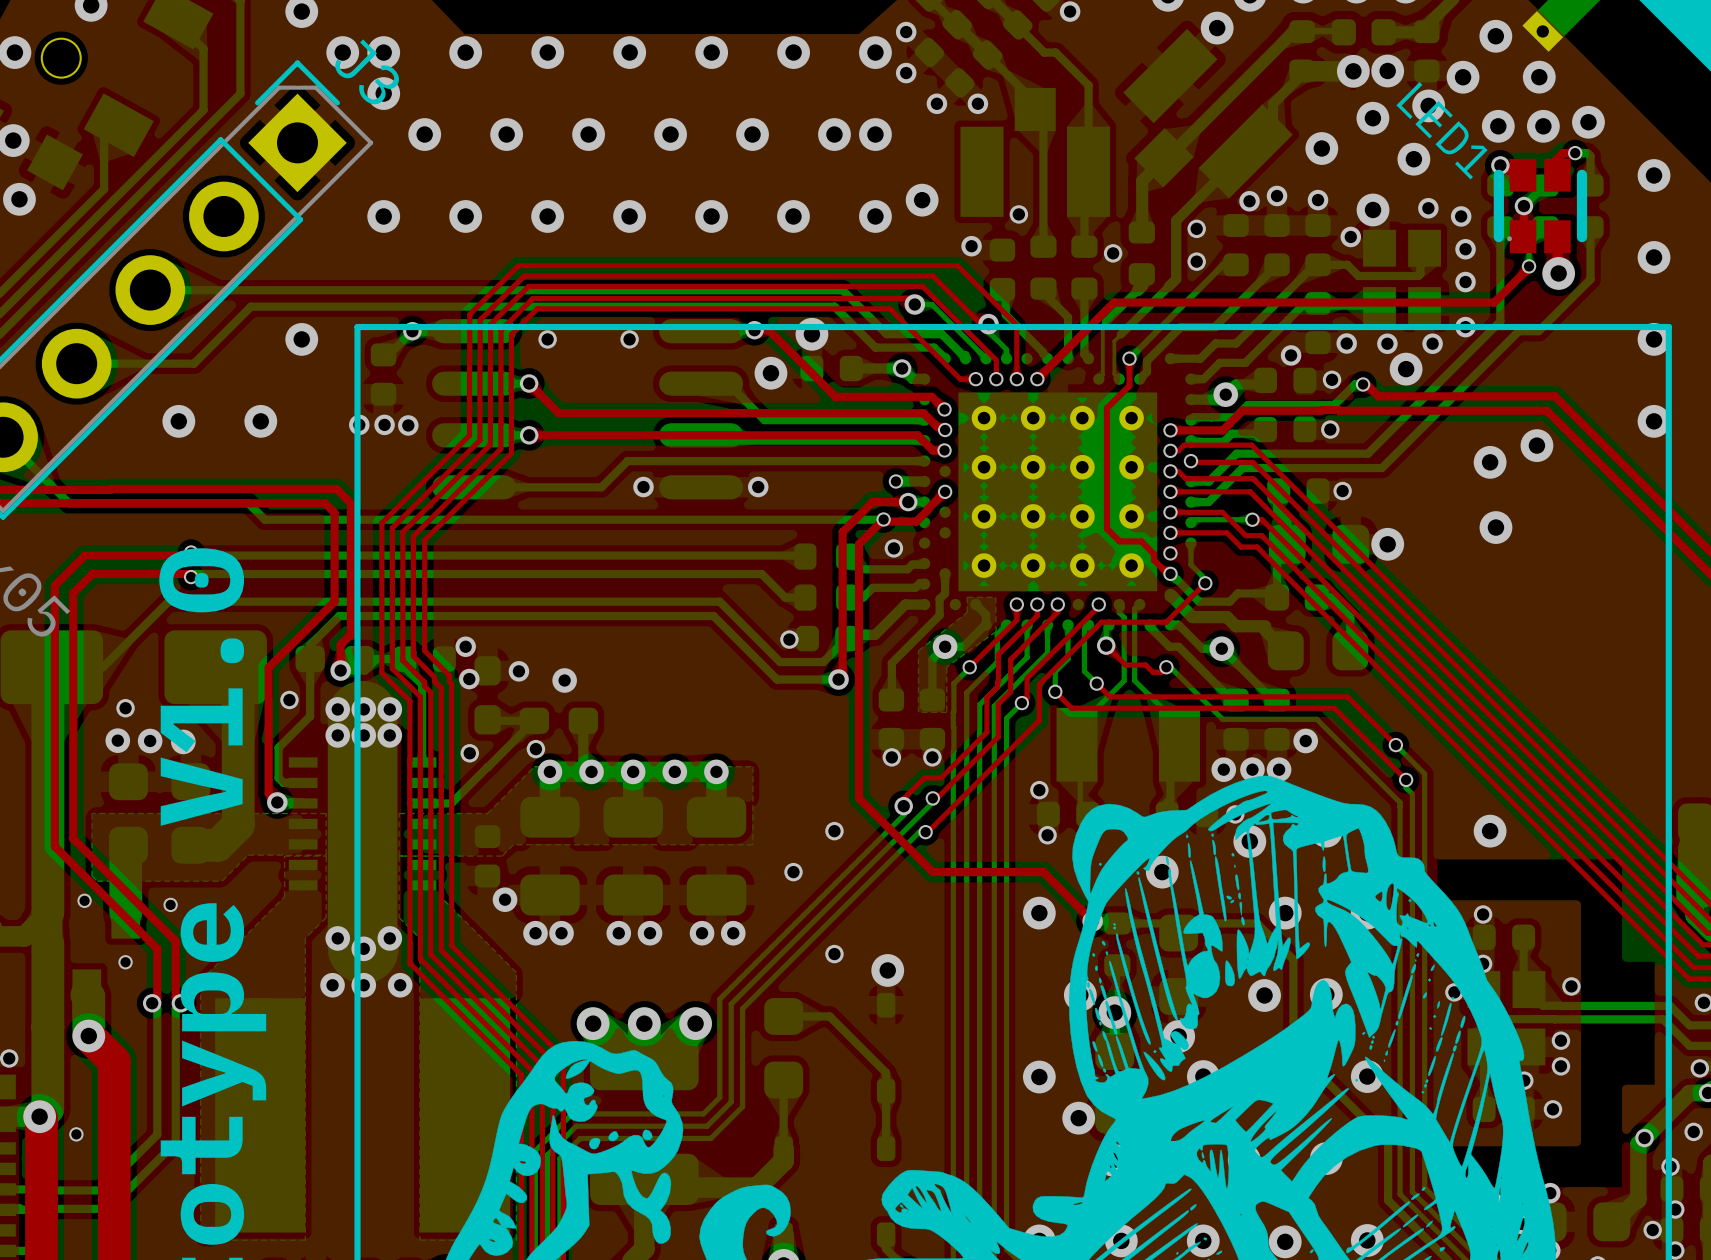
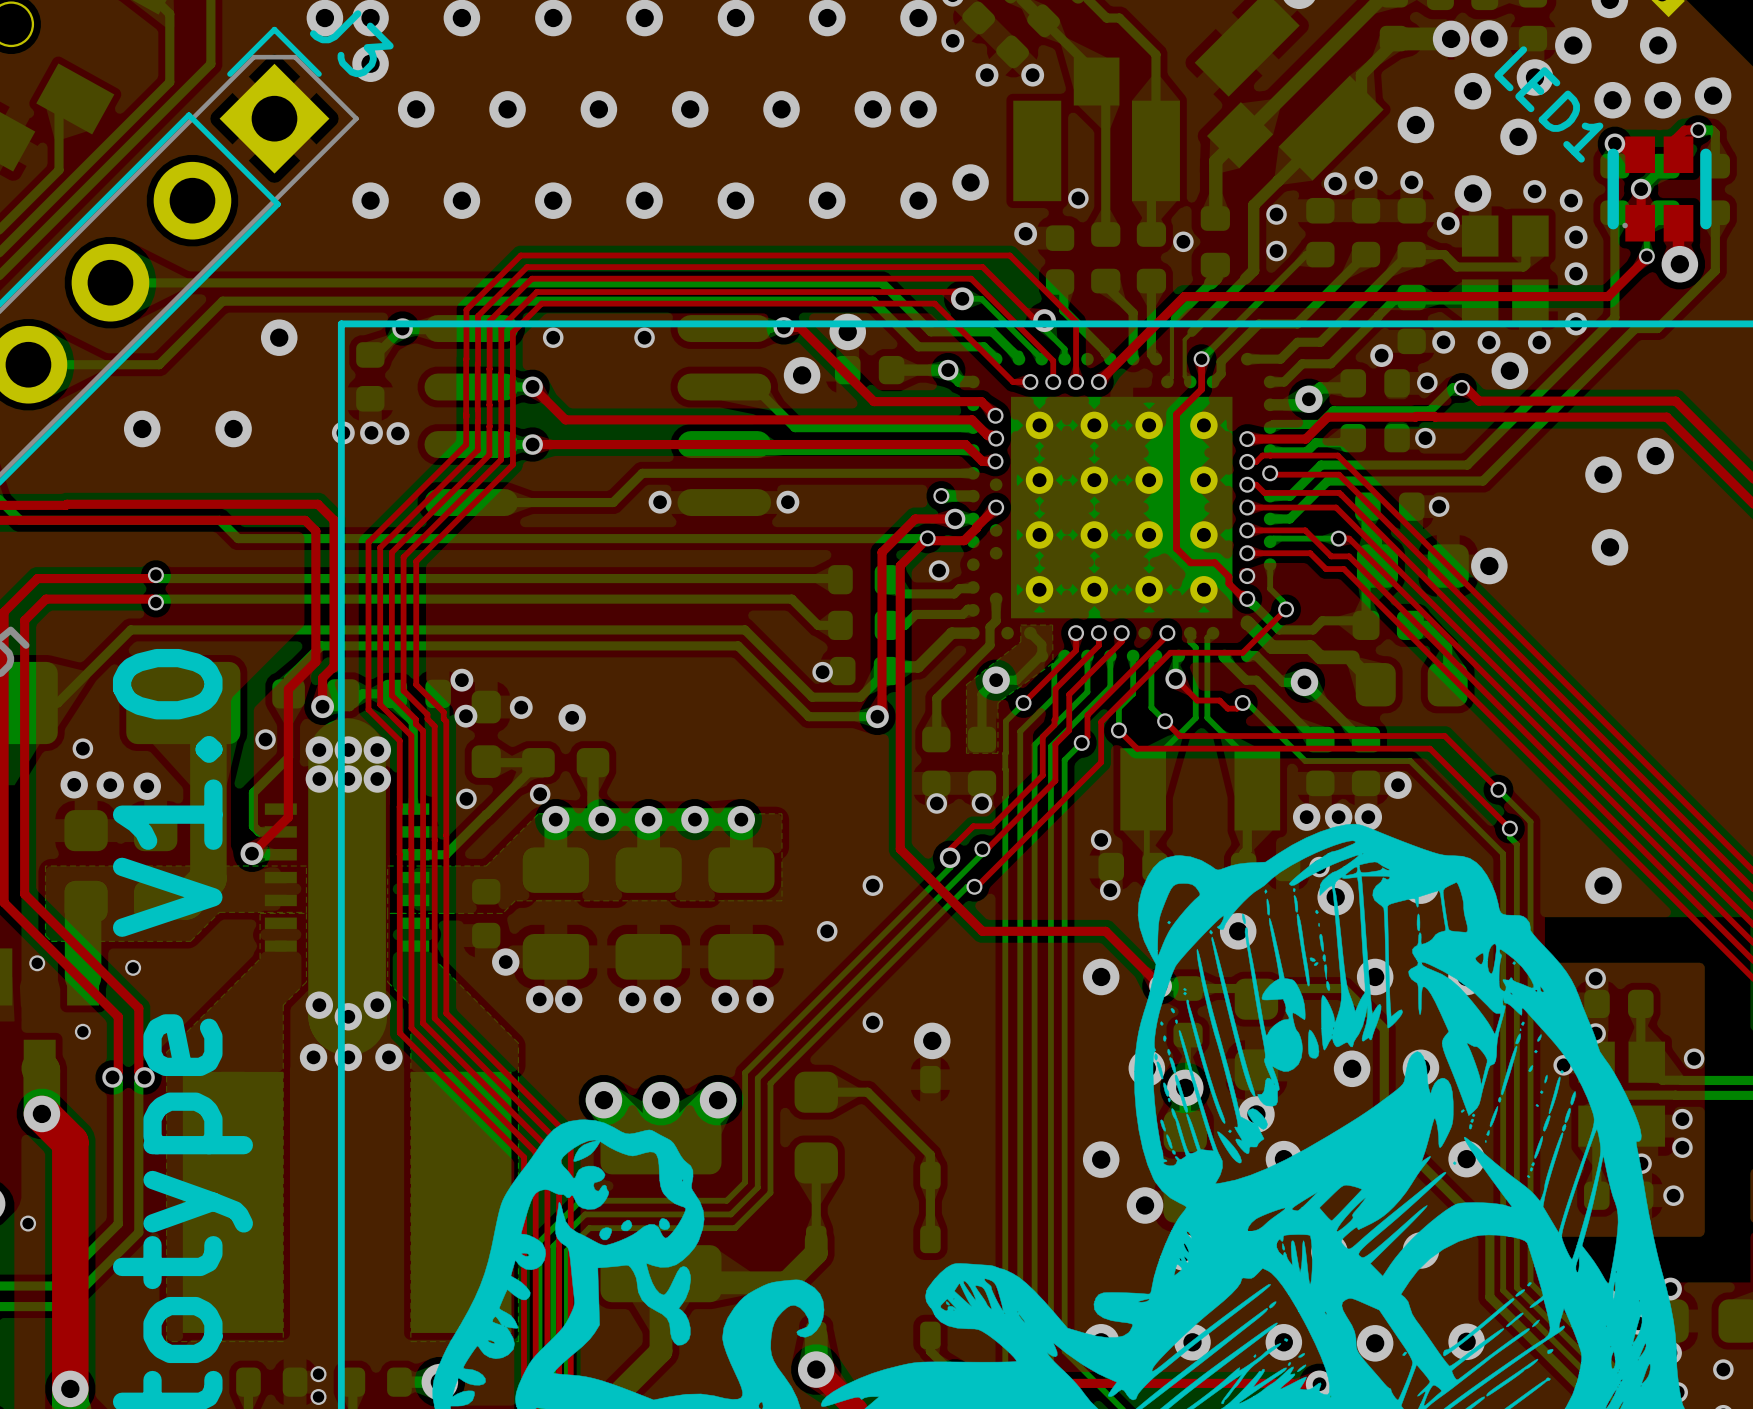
top track: (334, 601) (268, 667) (268, 793) (277, 802) -> (315, 629) (315, 661) (288, 689) (288, 817) (251, 853)

